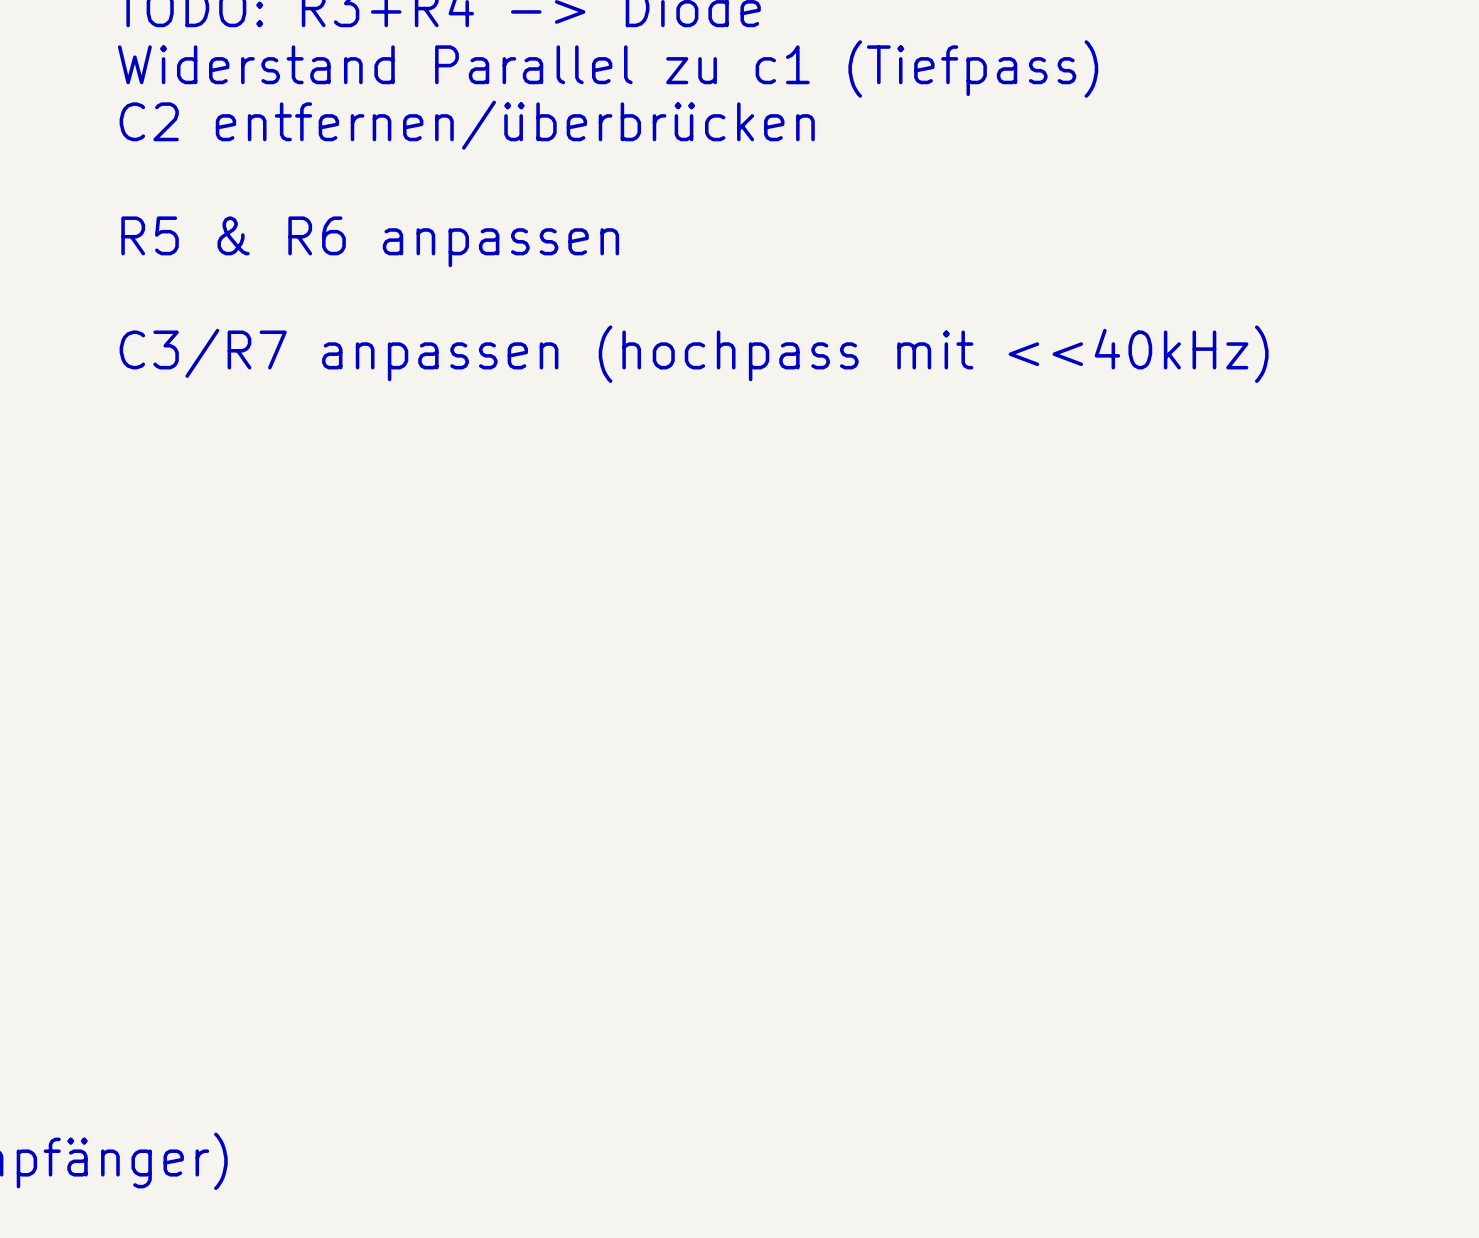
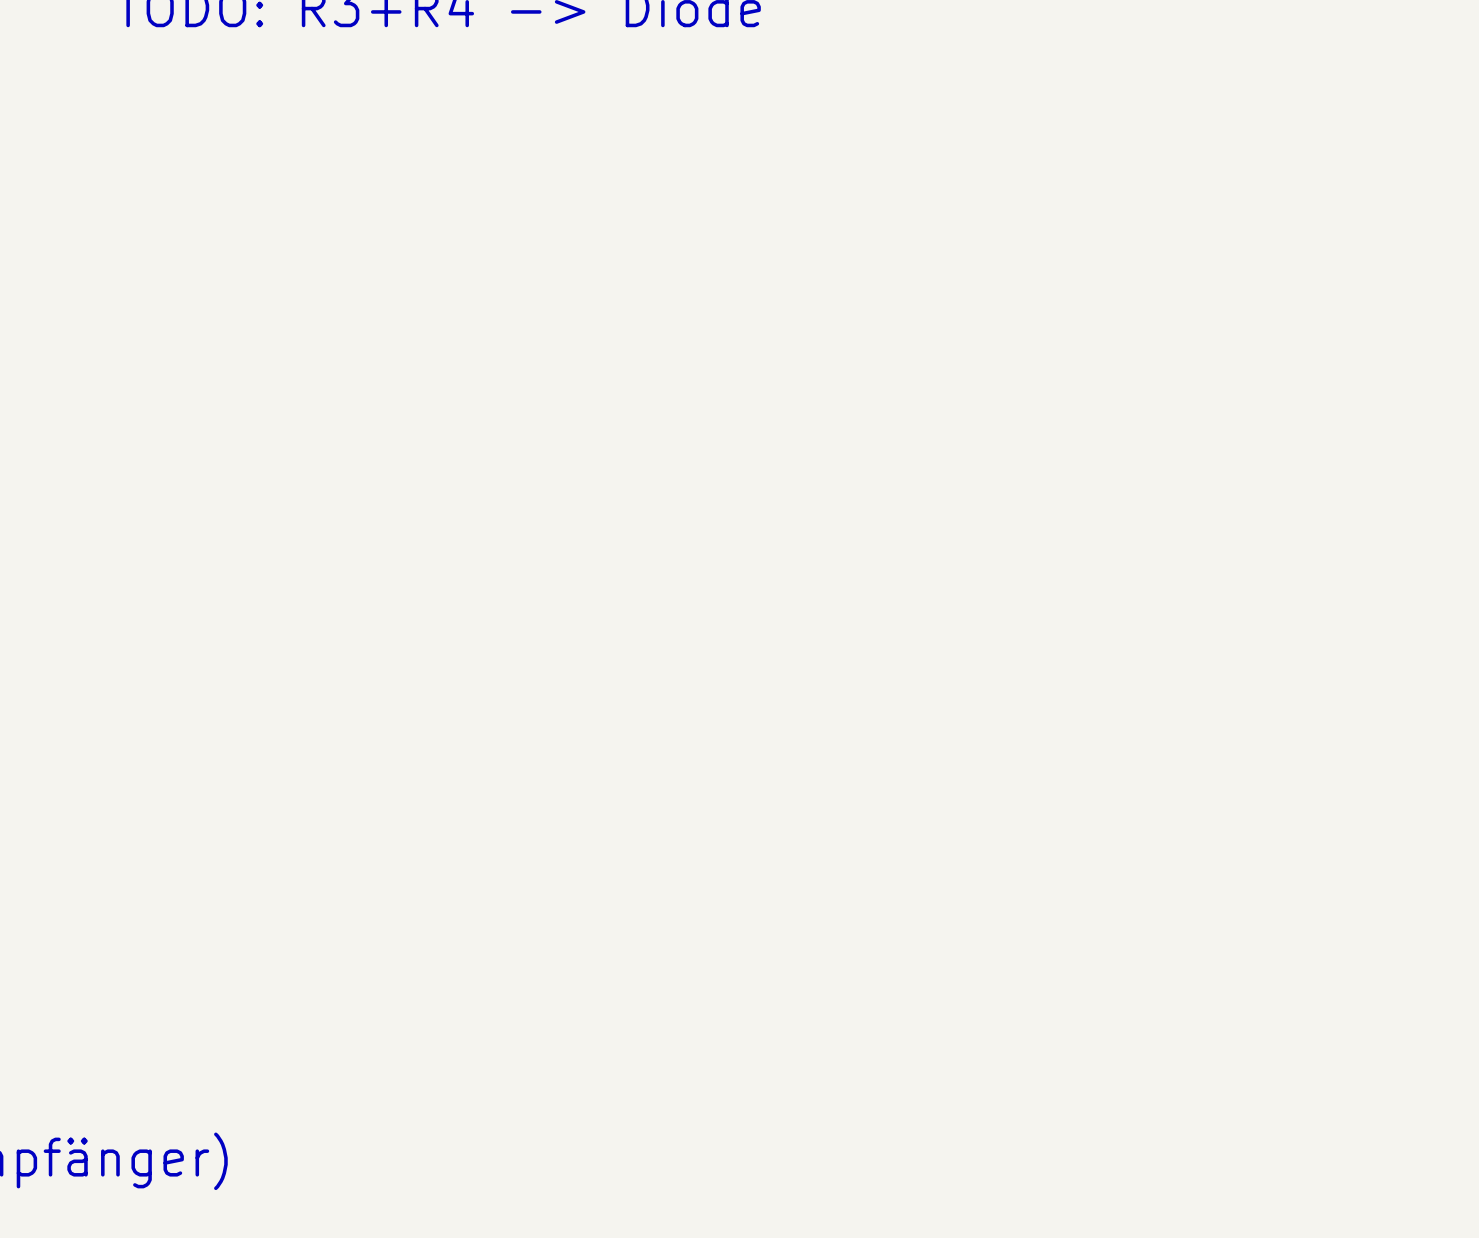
text: Widerstand Parallel zu c1 (Tiefpass) (608, 68) -> none
text: C2 entfernen/überbrücken (467, 125) -> none
text: R5 & R6 anpassen (370, 241) -> none
text: C3/R7 anpassen (hochpass mit <<40kHz) (694, 354) -> none

